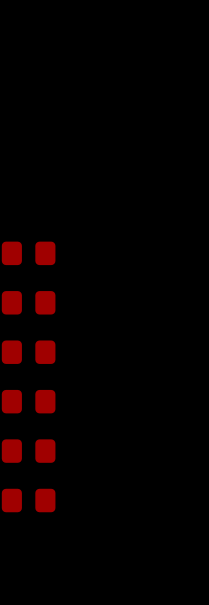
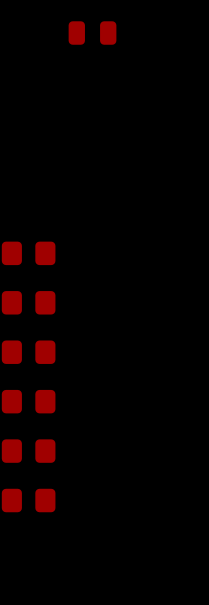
part: none -> (92, 33)

